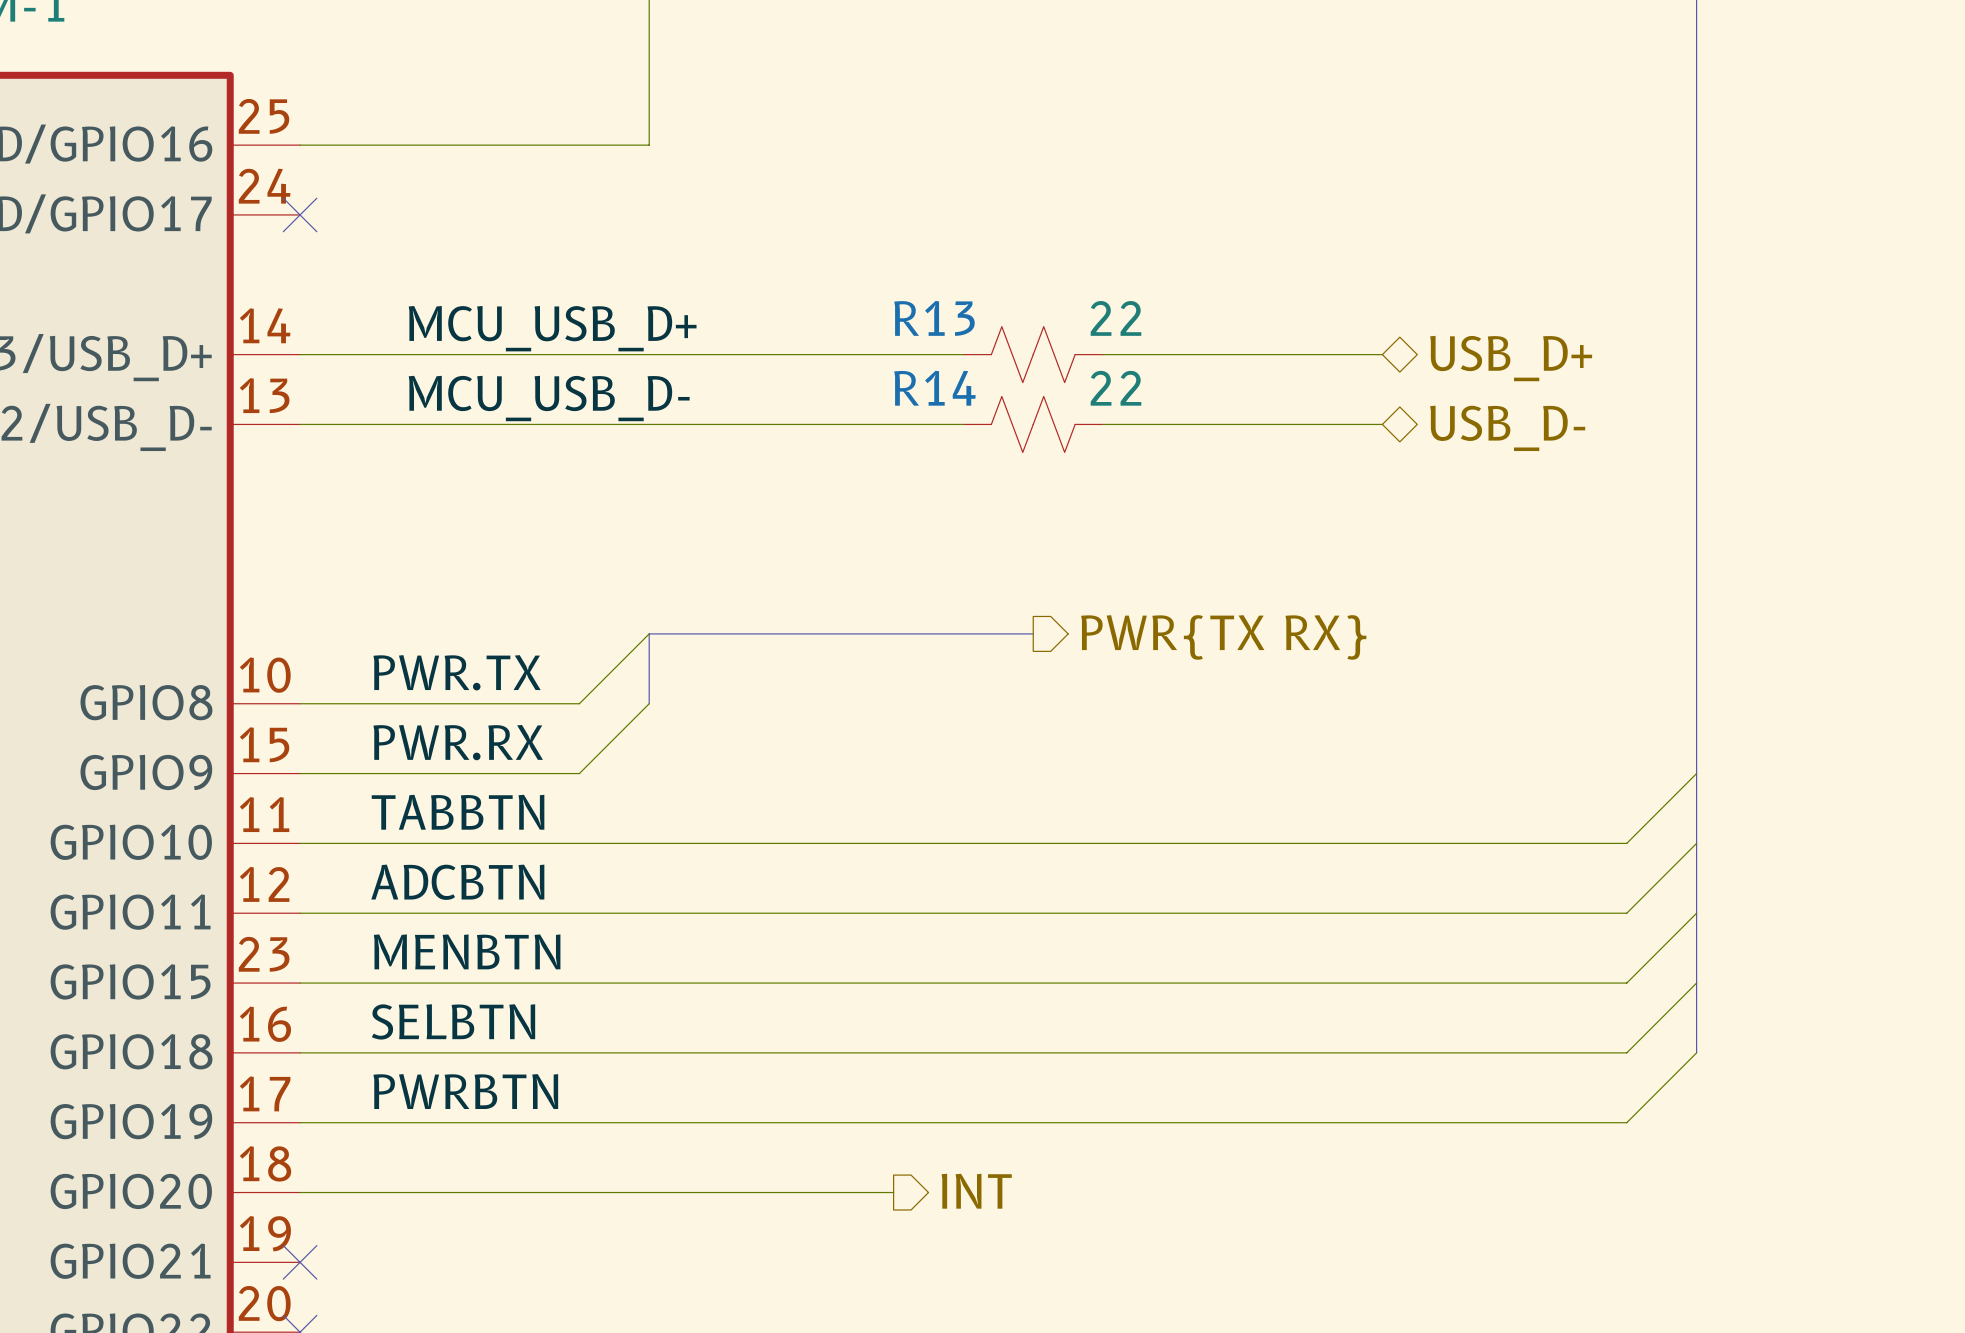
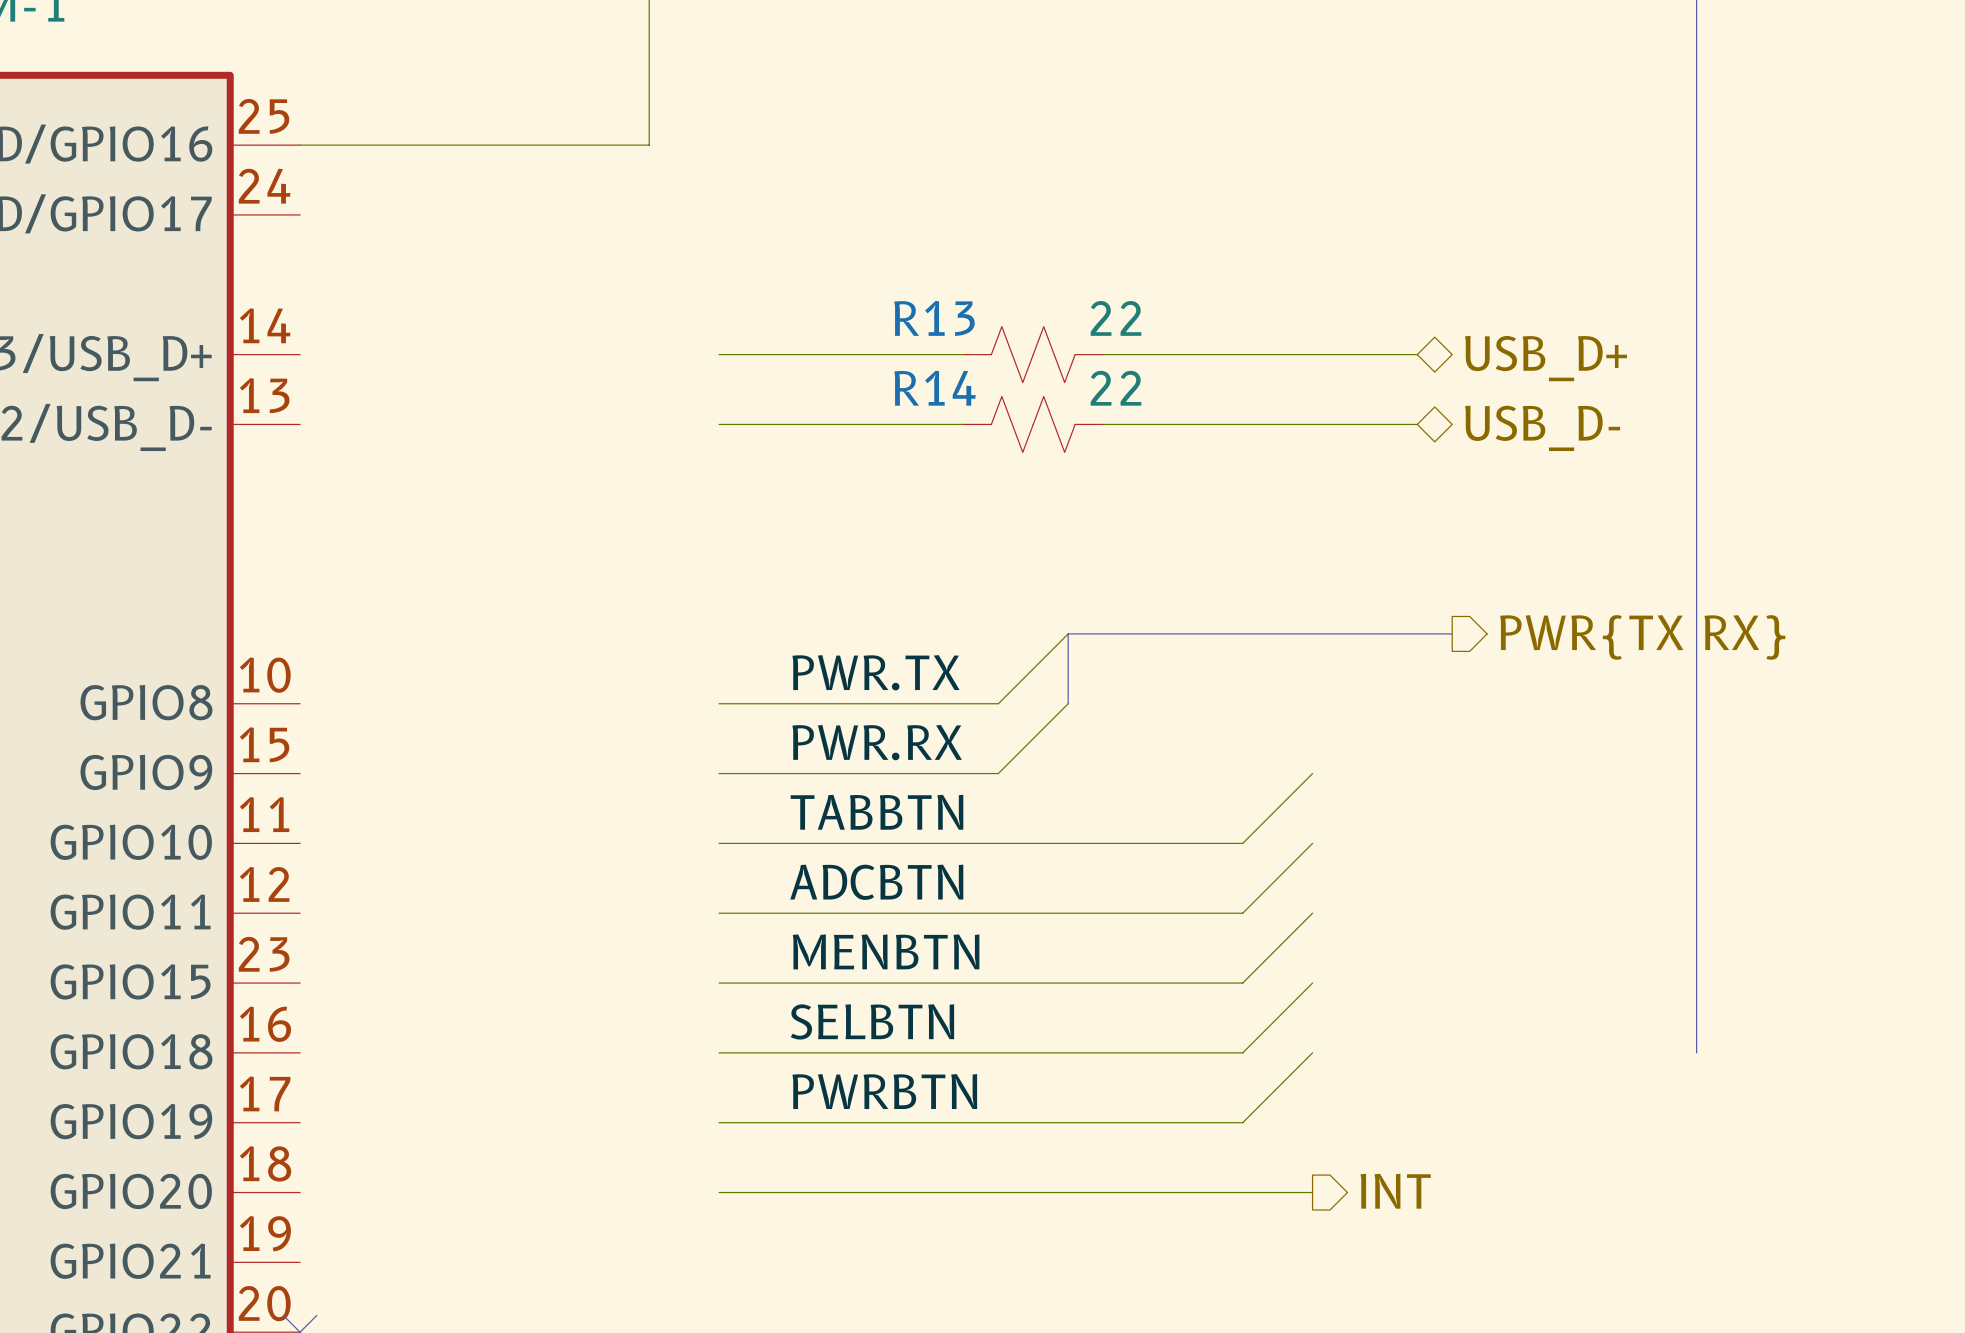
no-connect mark: (300, 214) -> none
label: MCU_USB_D+ (552, 328) -> none
wire: (300, 354) (719, 354) -> none
wire: none -> (1382, 354) (1417, 354)
hierarchical label position: USB_D+ (1511, 358) -> USB_D+ (1546, 358)
label: MCU_USB_D- (549, 398) -> none
wire: (300, 424) (719, 424) -> none
wire: none -> (1382, 424) (1417, 424)
hierarchical label position: USB_D- (1507, 428) -> USB_D- (1542, 428)
wire: (649, 633) (579, 703) (300, 703) -> (1068, 633) (998, 703) (719, 703)
bus: (1033, 633) (649, 633) (649, 703) -> (1452, 633) (1068, 633) (1068, 703)
hierarchical label position: PWR{TX RX} (1223, 637) -> PWR{TX RX} (1642, 637)
label position: PWR.TX (457, 672) -> PWR.TX (876, 672)
wire: (649, 703) (579, 773) (300, 773) -> (1068, 703) (998, 773) (719, 773)
label position: PWR.RX (458, 742) -> PWR.RX (877, 742)
wire: (1696, 773) (1626, 843) (1242, 843) -> (1312, 773) (1242, 843)
label position: TABBTN (458, 812) -> TABBTN (877, 812)
wire: (300, 843) (719, 843) -> none
wire: (1696, 843) (1626, 913) (1242, 913) -> (1312, 843) (1242, 913)
label position: ADCBTN (457, 882) -> ADCBTN (876, 882)
wire: (300, 913) (719, 913) -> none
wire: (1696, 913) (1626, 983) (1242, 983) -> (1312, 913) (1242, 983)
label position: MENBTN (467, 951) -> MENBTN (886, 951)
wire: (300, 983) (719, 983) -> none
wire: (1696, 983) (1626, 1052) (1242, 1052) -> (1312, 983) (1242, 1052)
label position: SELBTN (453, 1021) -> SELBTN (872, 1021)
wire: (300, 1052) (719, 1052) -> none
wire: (1696, 1052) (1626, 1122) (1242, 1122) -> (1312, 1052) (1242, 1122)
label position: PWRBTN (465, 1091) -> PWRBTN (884, 1091)
wire: (300, 1122) (719, 1122) -> none
hierarchical label position: INT (976, 1191) -> INT (1395, 1191)
wire: (300, 1192) (719, 1192) -> (893, 1192) (1312, 1192)
no-connect mark: (300, 1262) -> none

